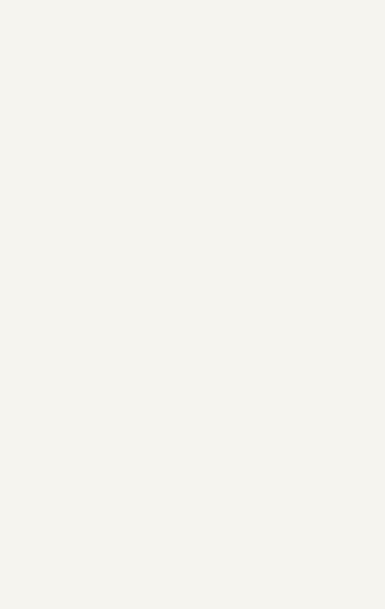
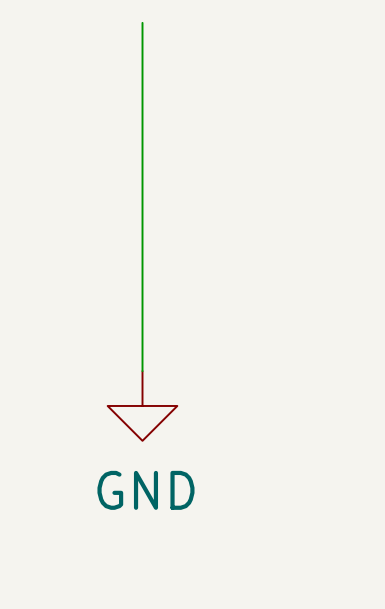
wire: none -> (142, 22) (142, 371)
power symbol: none -> GND (142, 405)

